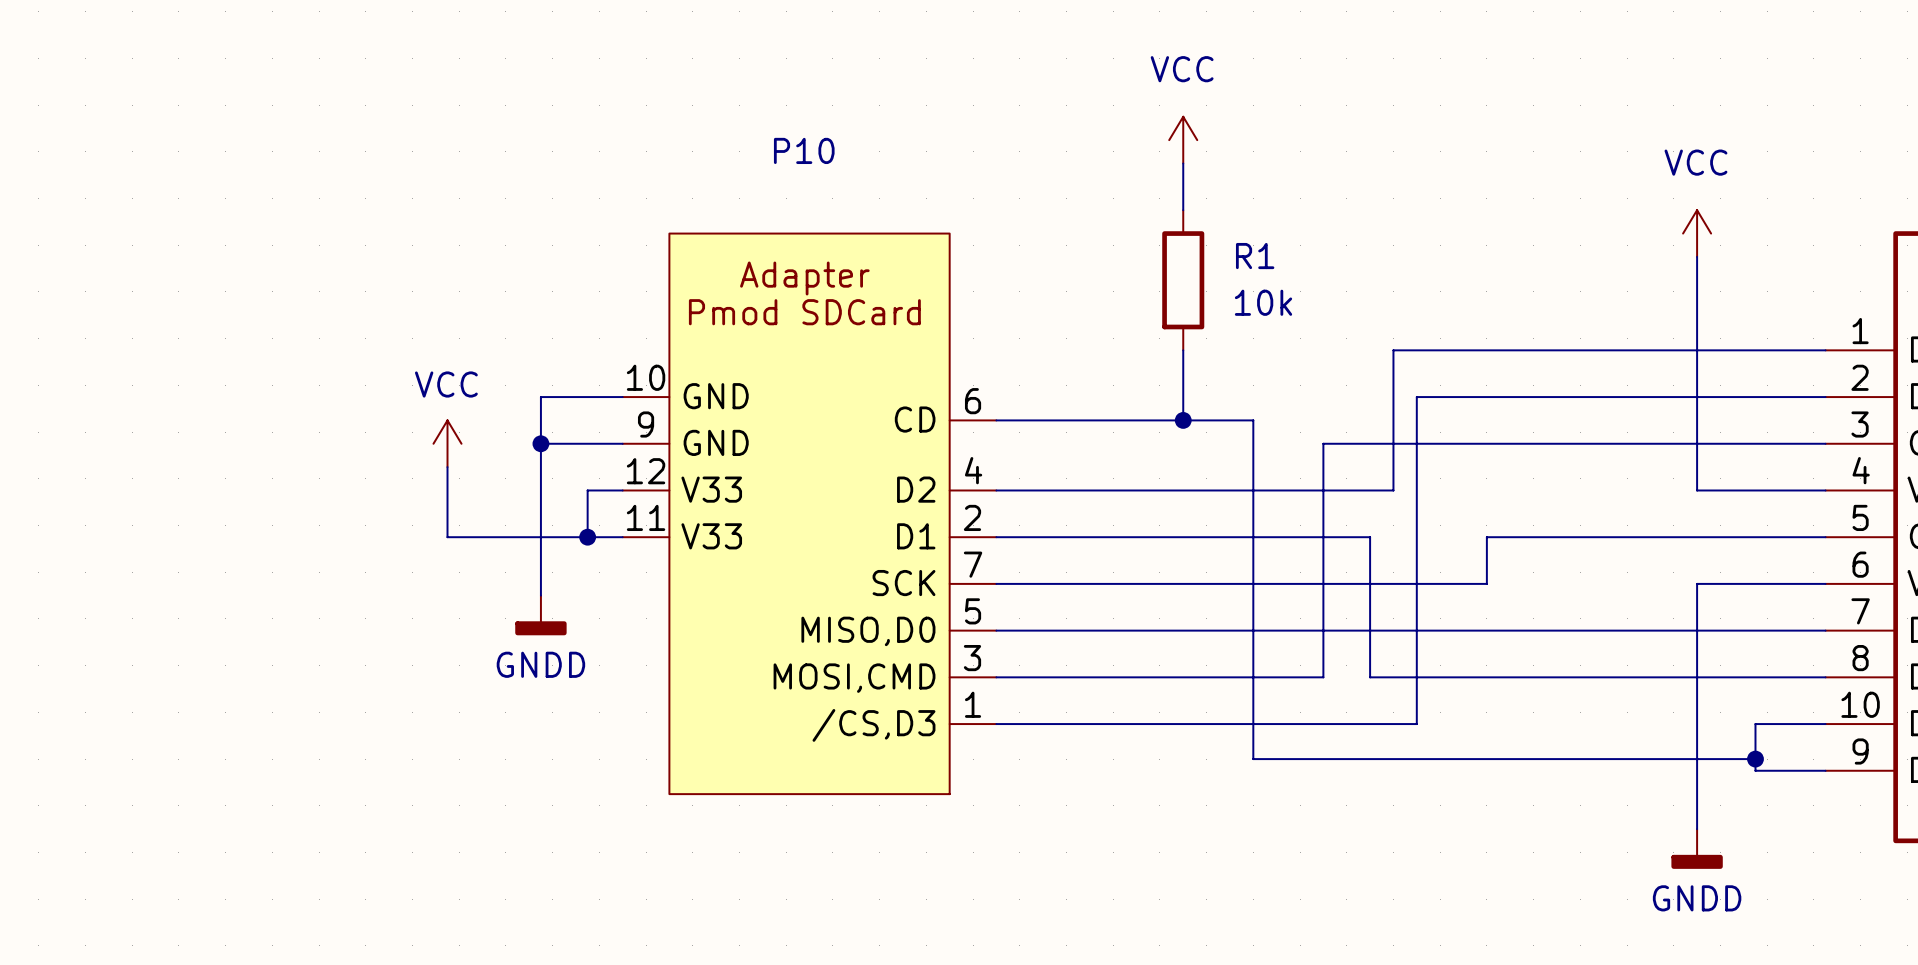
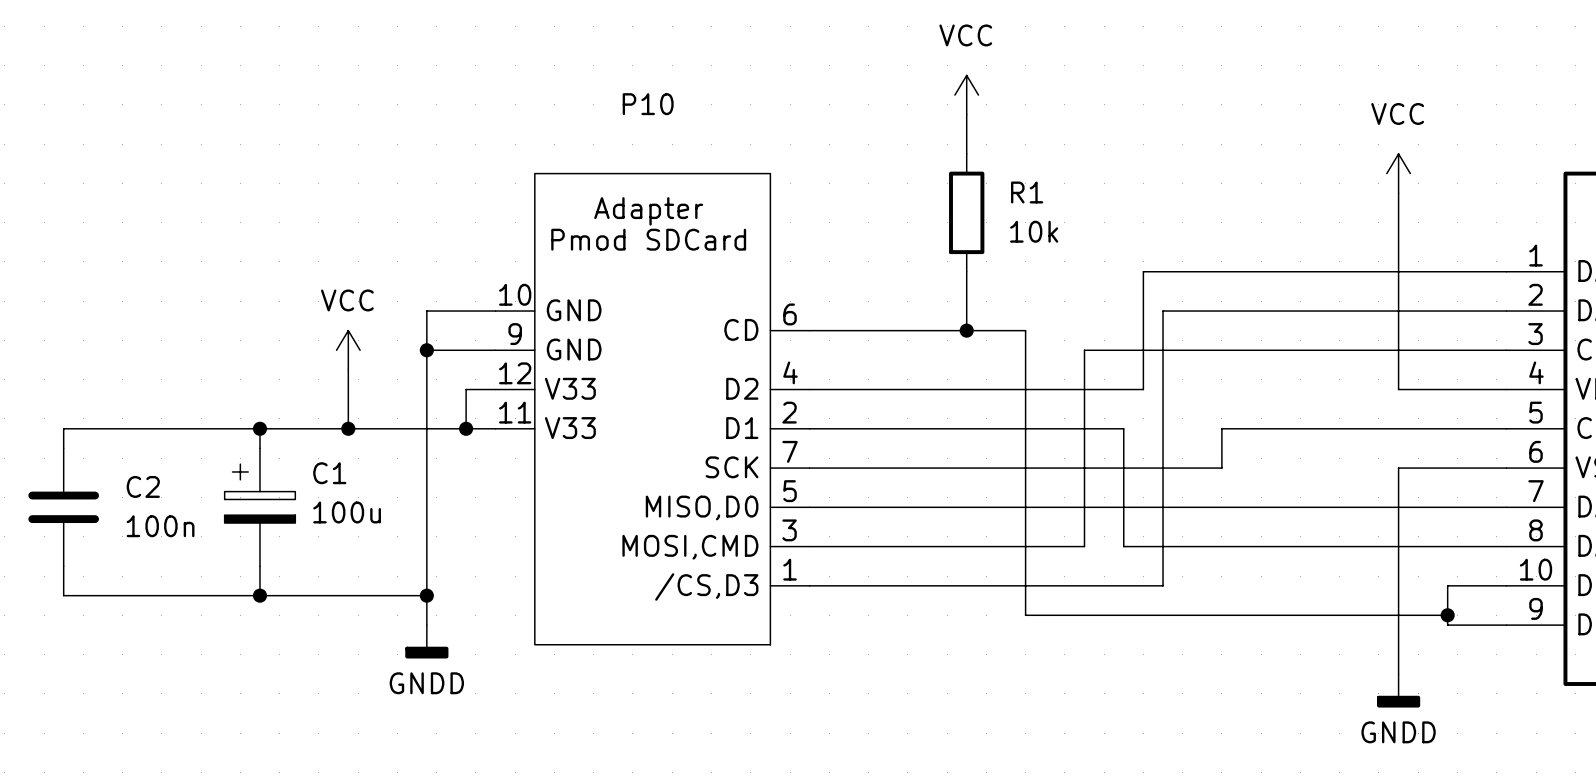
wire: none -> (259, 428) (259, 448)
junction: none -> (259, 428)
wire: none -> (348, 428) (63, 428) (63, 448)
junction: none -> (348, 428)
wire: none -> (426, 477) (426, 625)
power symbol position: GNDD (540, 615) -> GNDD (426, 641)
C2: none -> 100n (63, 507)
C1: none -> 100u (259, 507)
wire: none -> (63, 566) (63, 595) (426, 595)
wire: none -> (259, 566) (259, 595)
junction: none -> (259, 595)
junction: none -> (426, 595)

